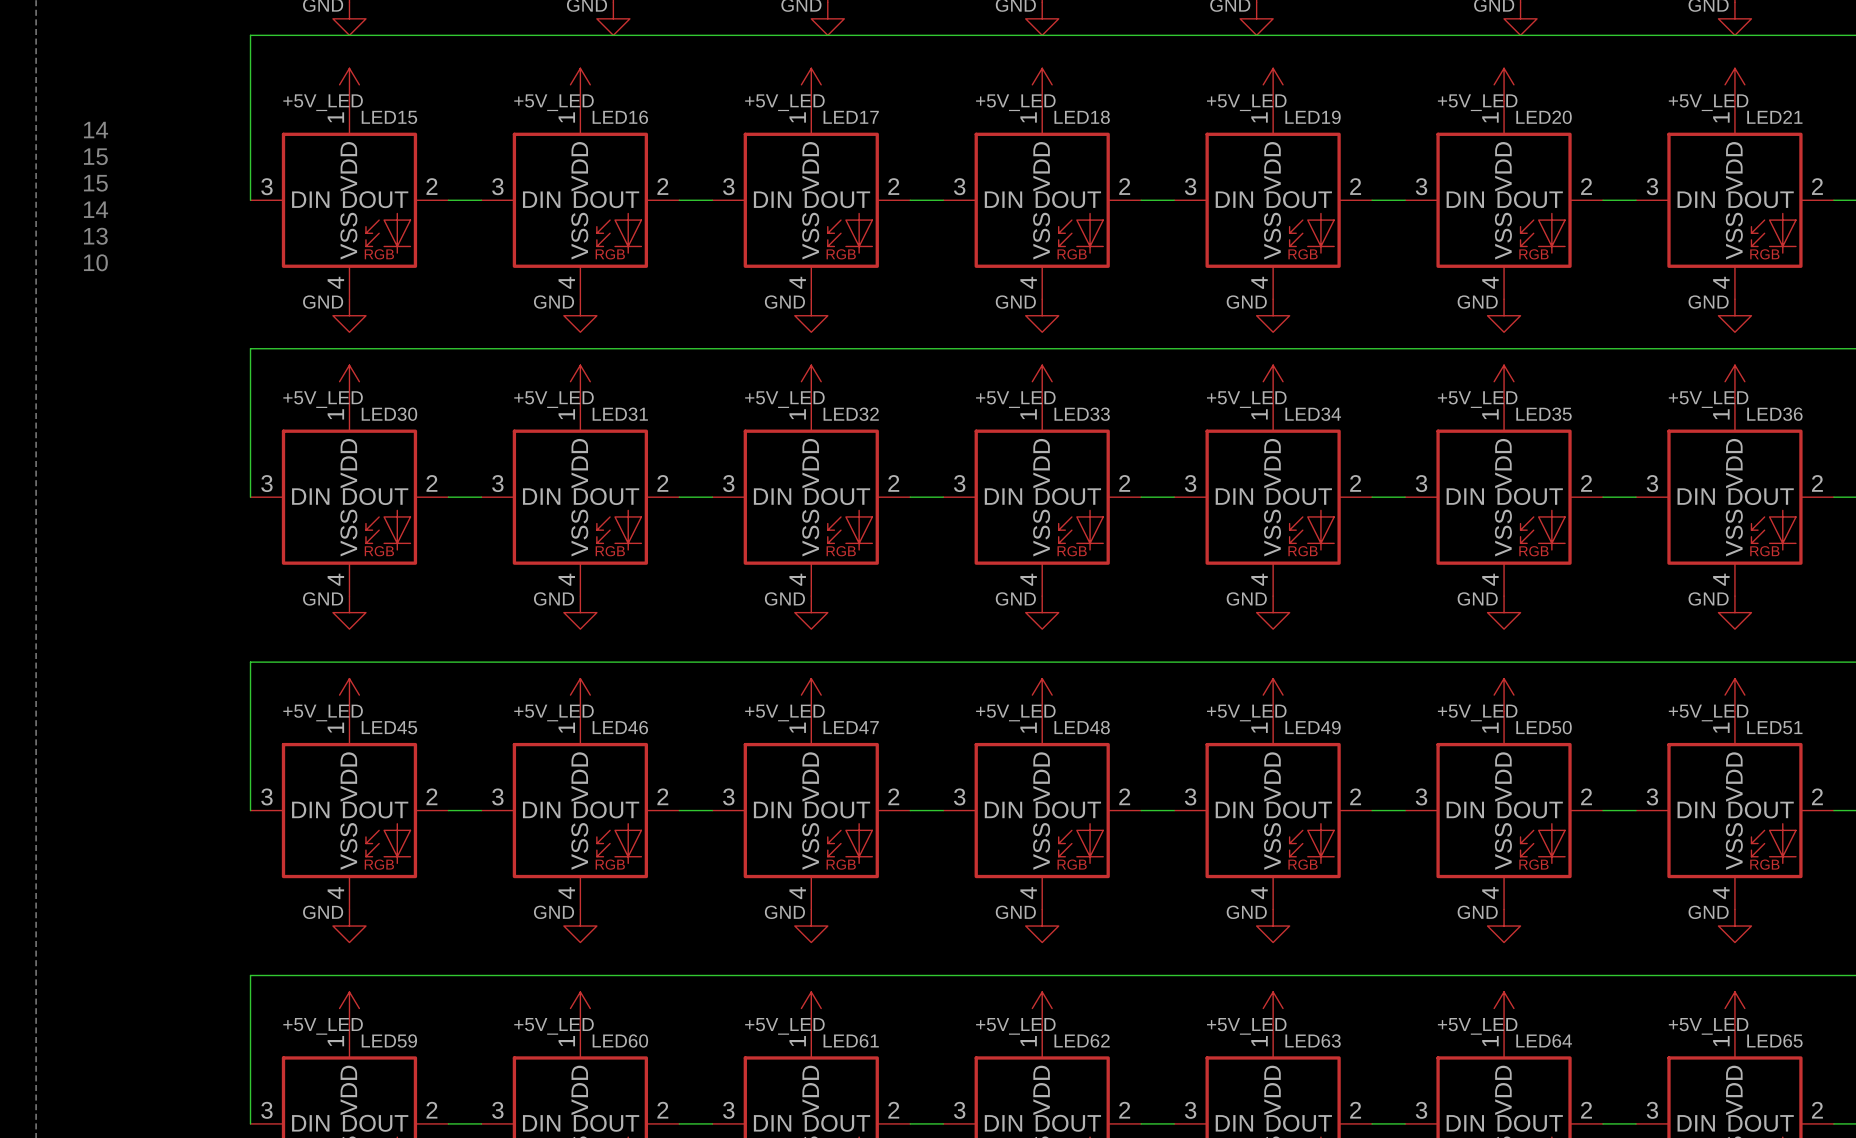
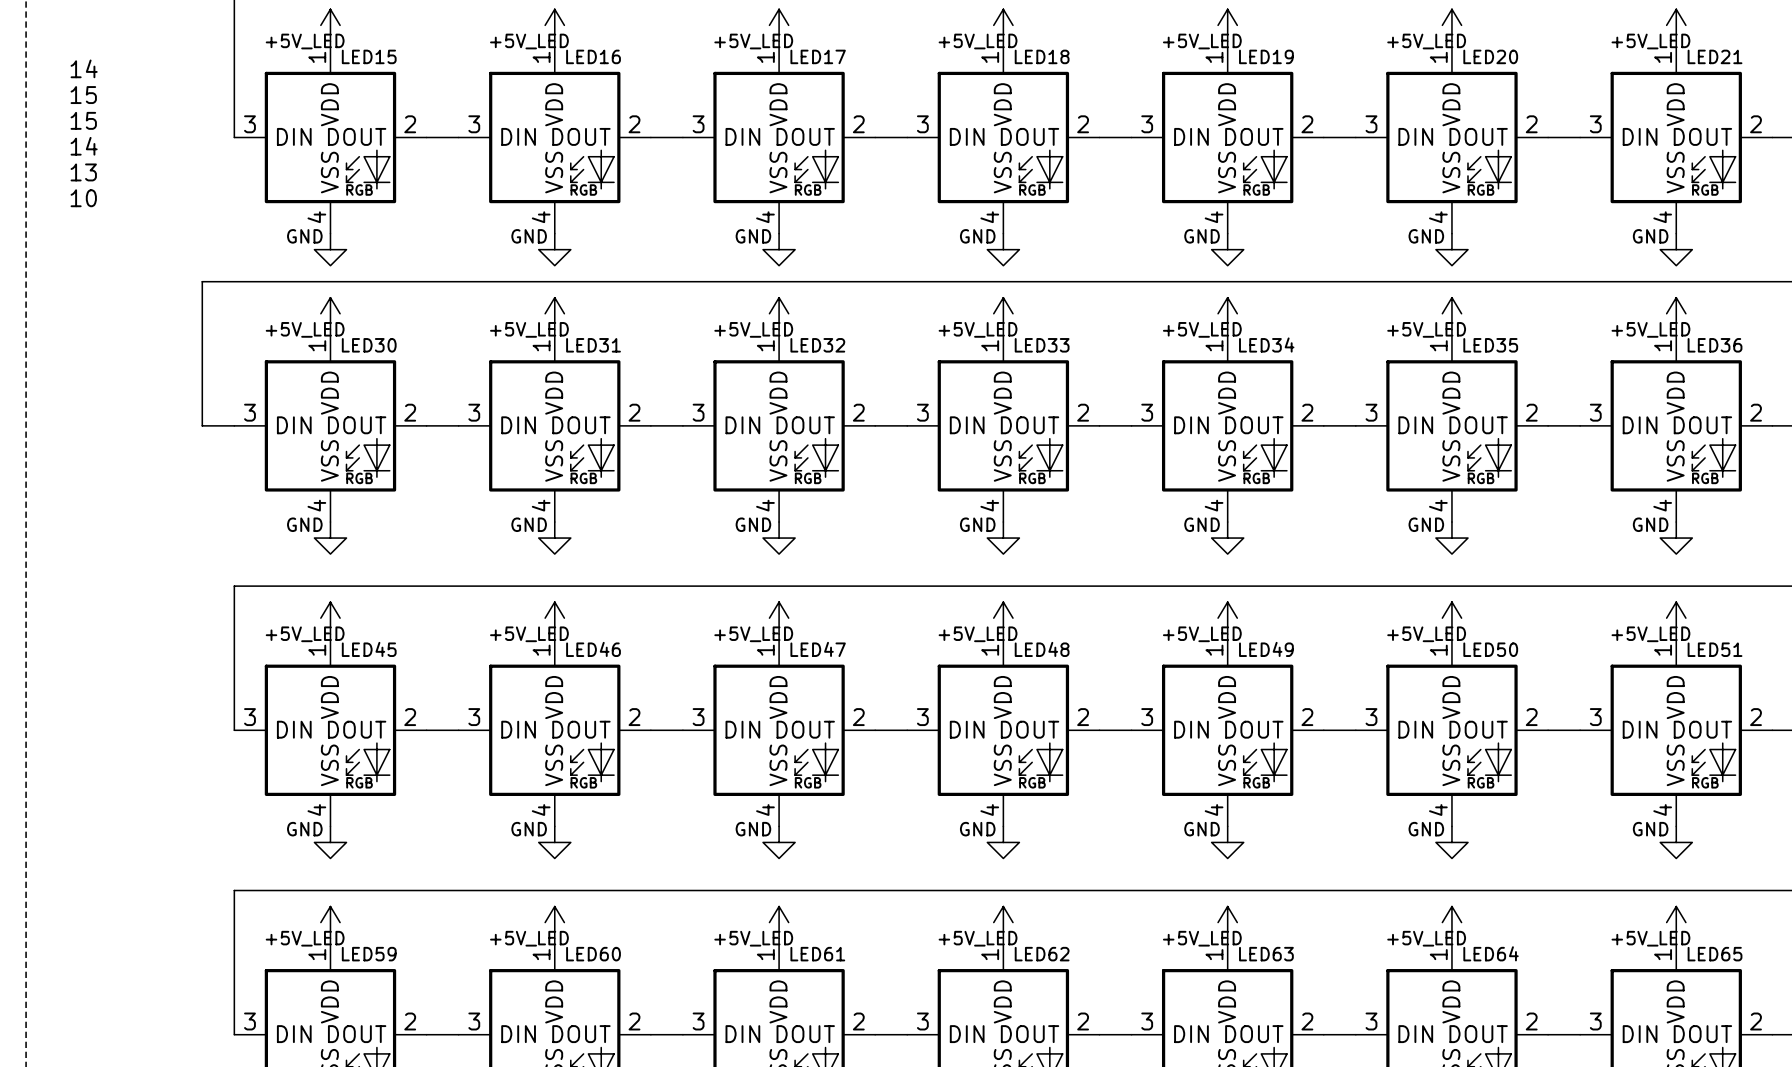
wire: (250, 348) (250, 497) -> (234, 281) (202, 281) (202, 425) (234, 425)

